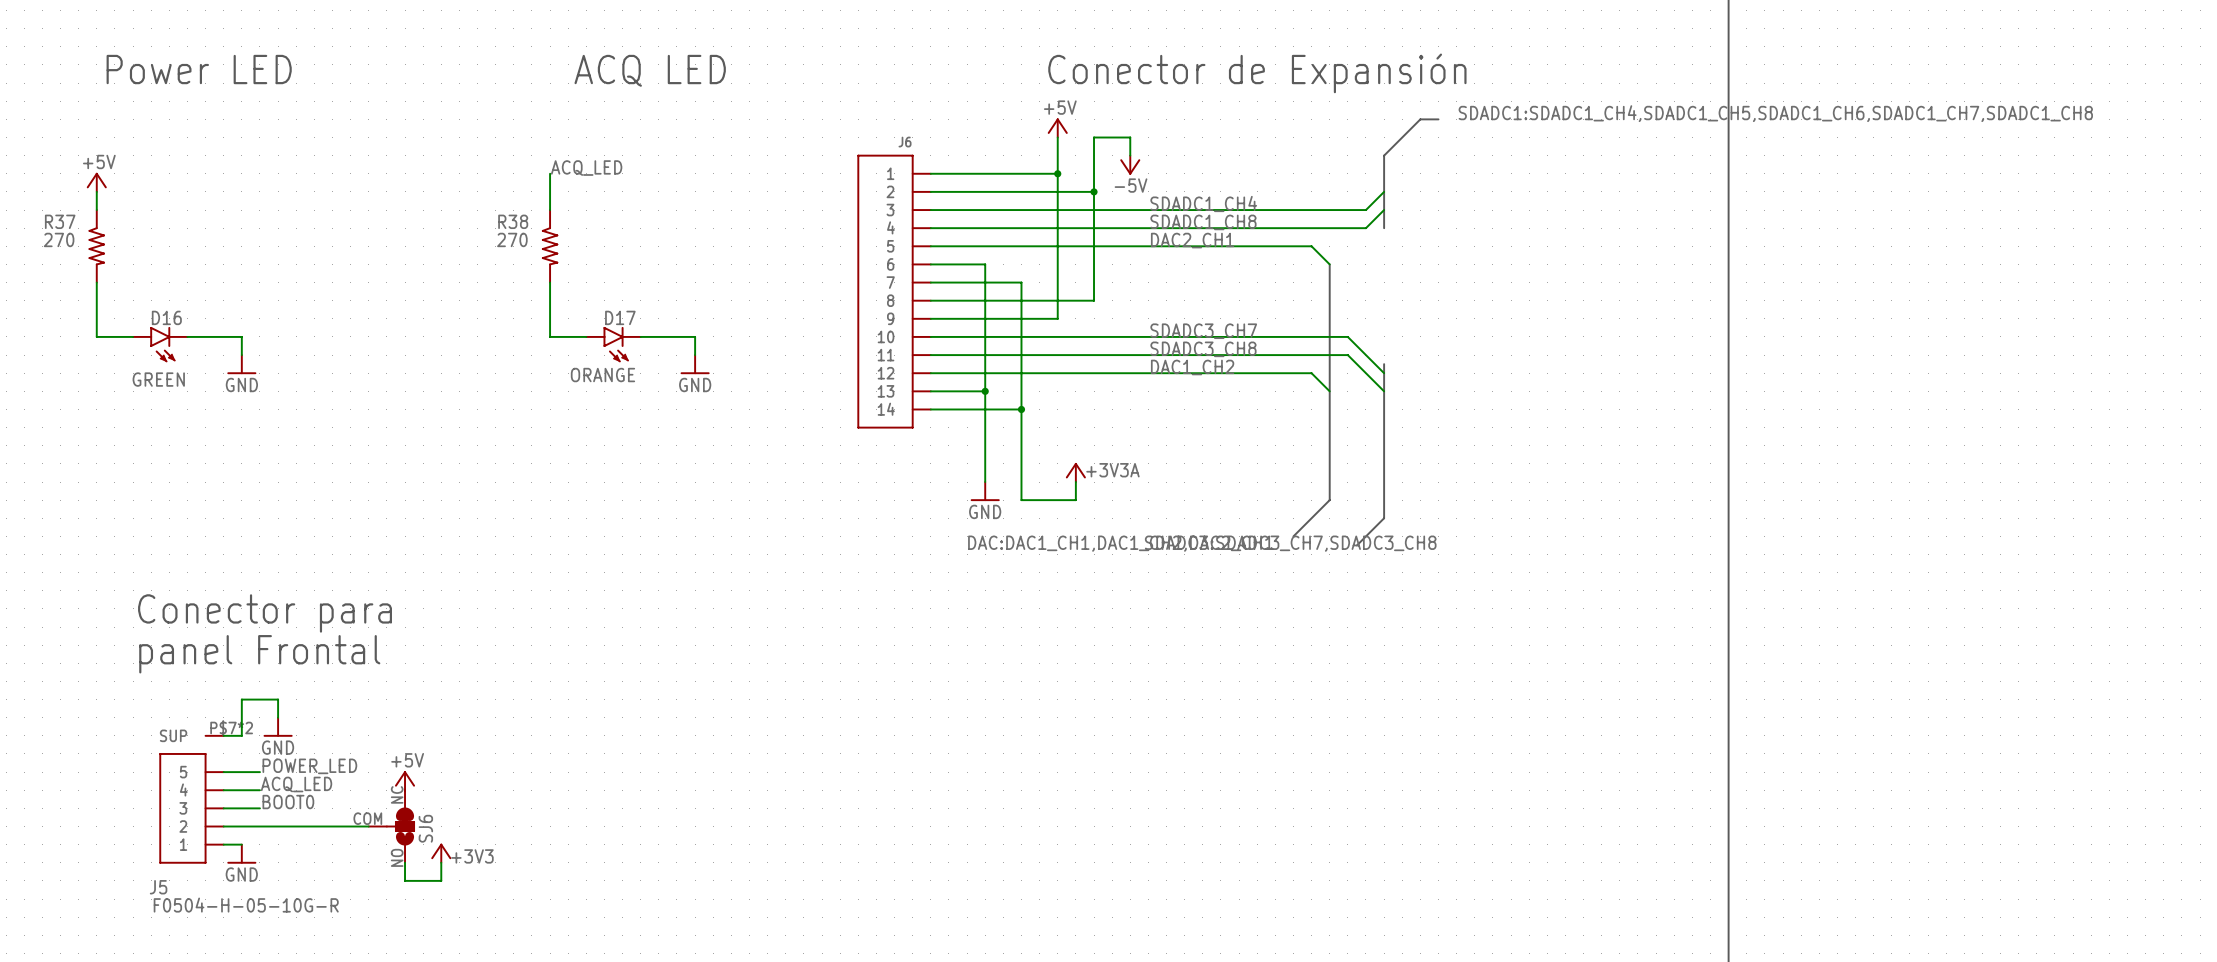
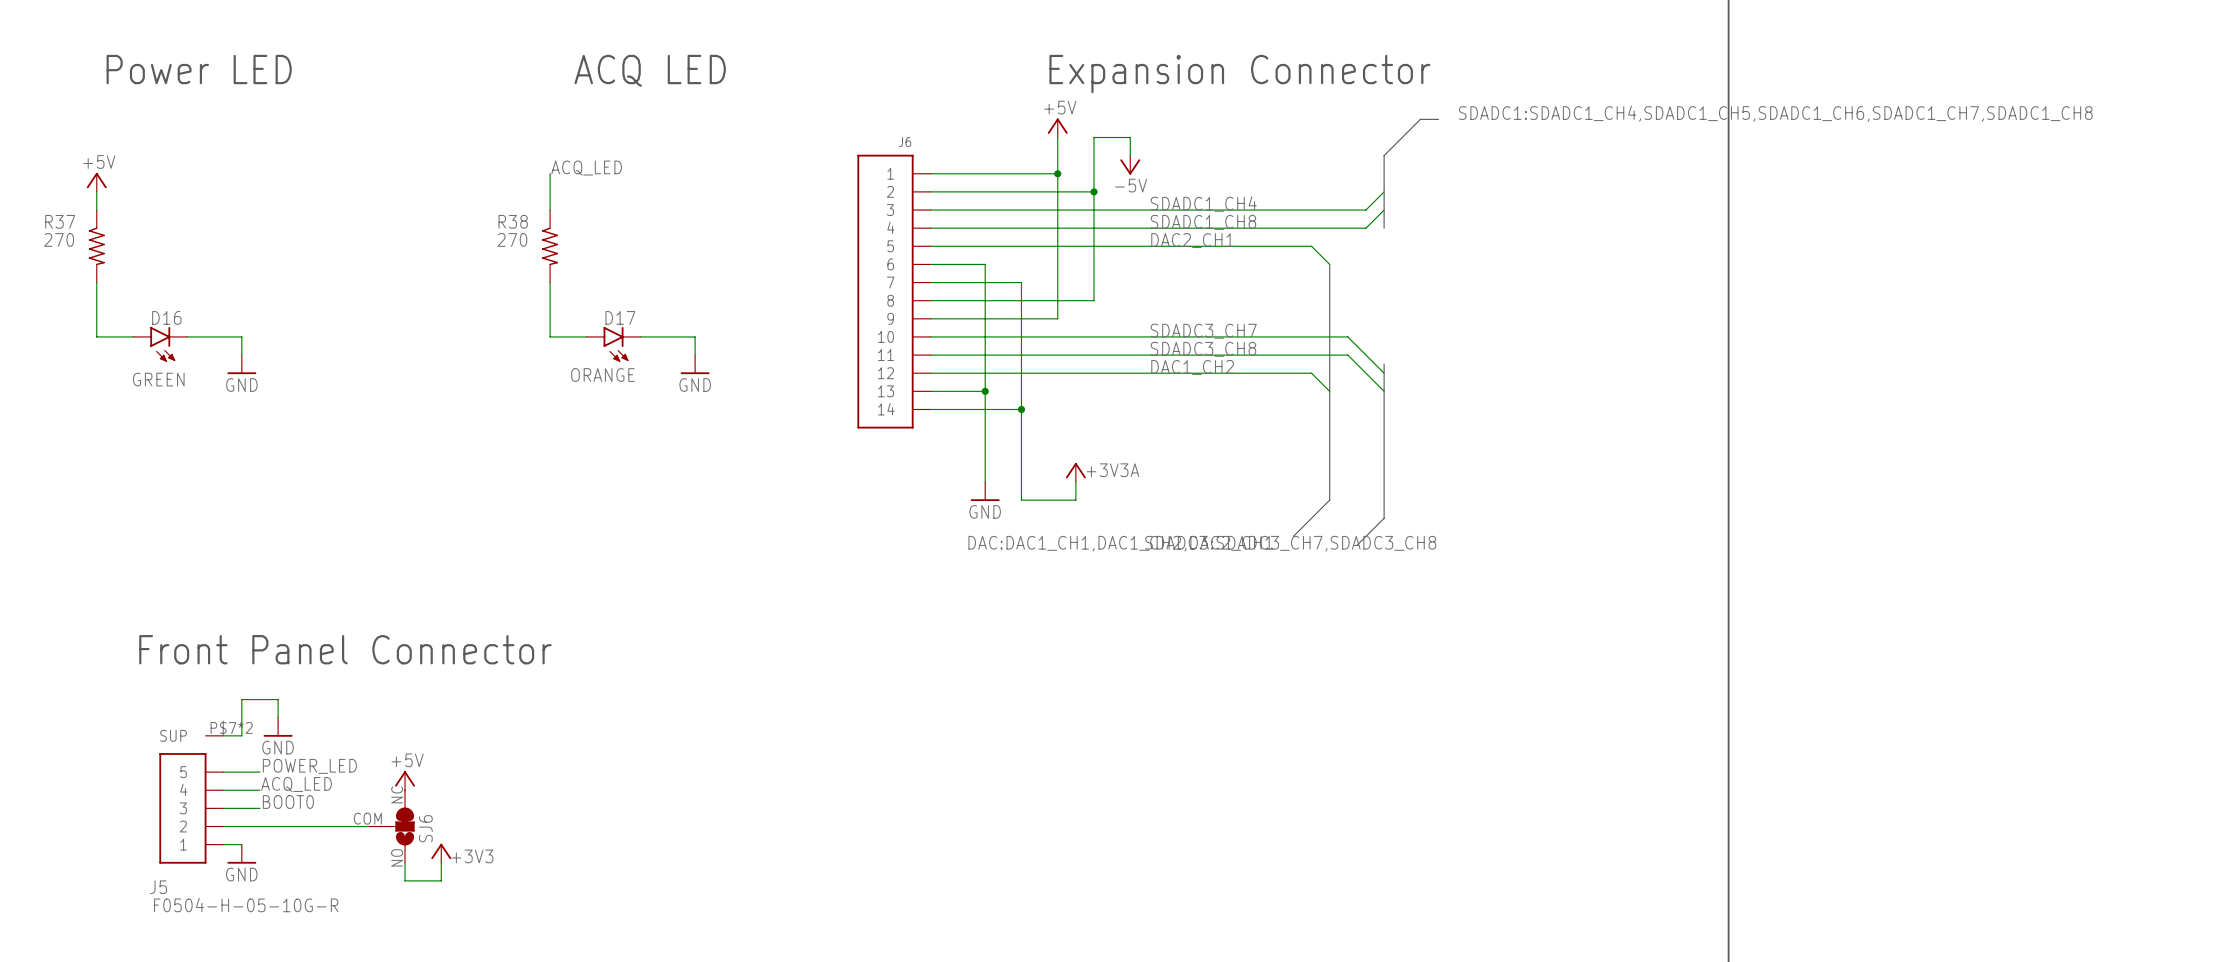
text: Conector de Expansión (1257, 73) -> Expansion Connector (1239, 74)
text: Conector para (265, 613) -> none
text: panel Frontal (259, 654) -> Front Panel Connector (345, 649)

